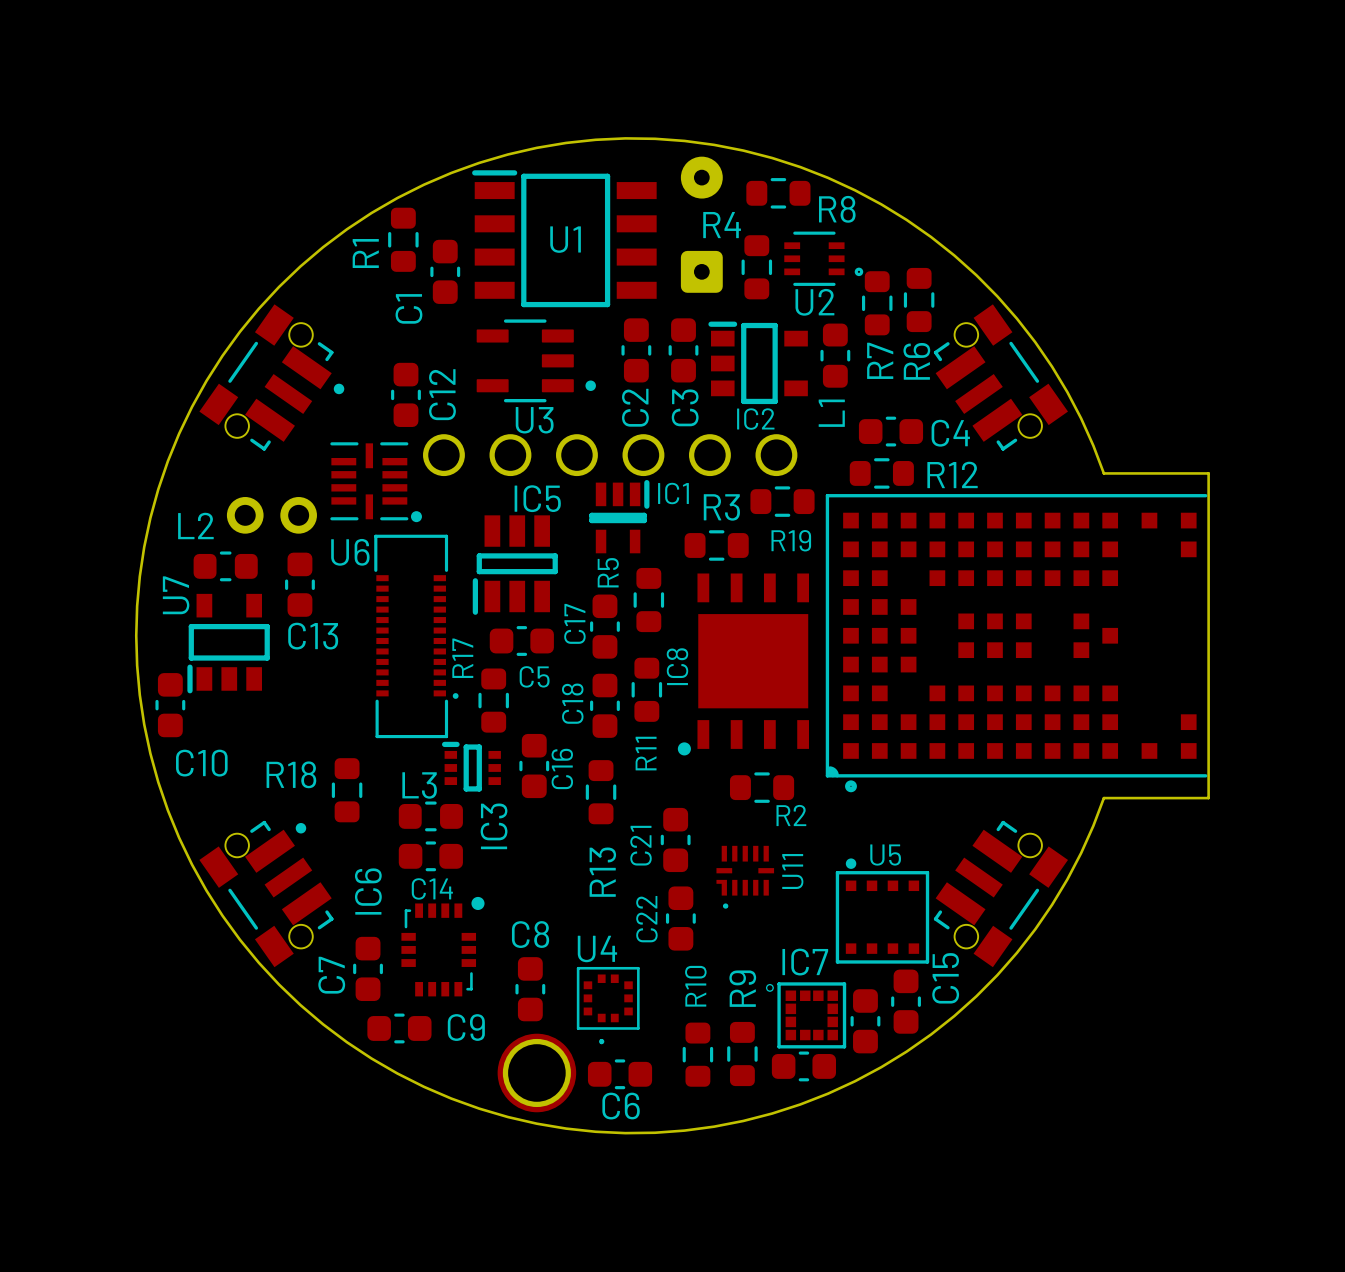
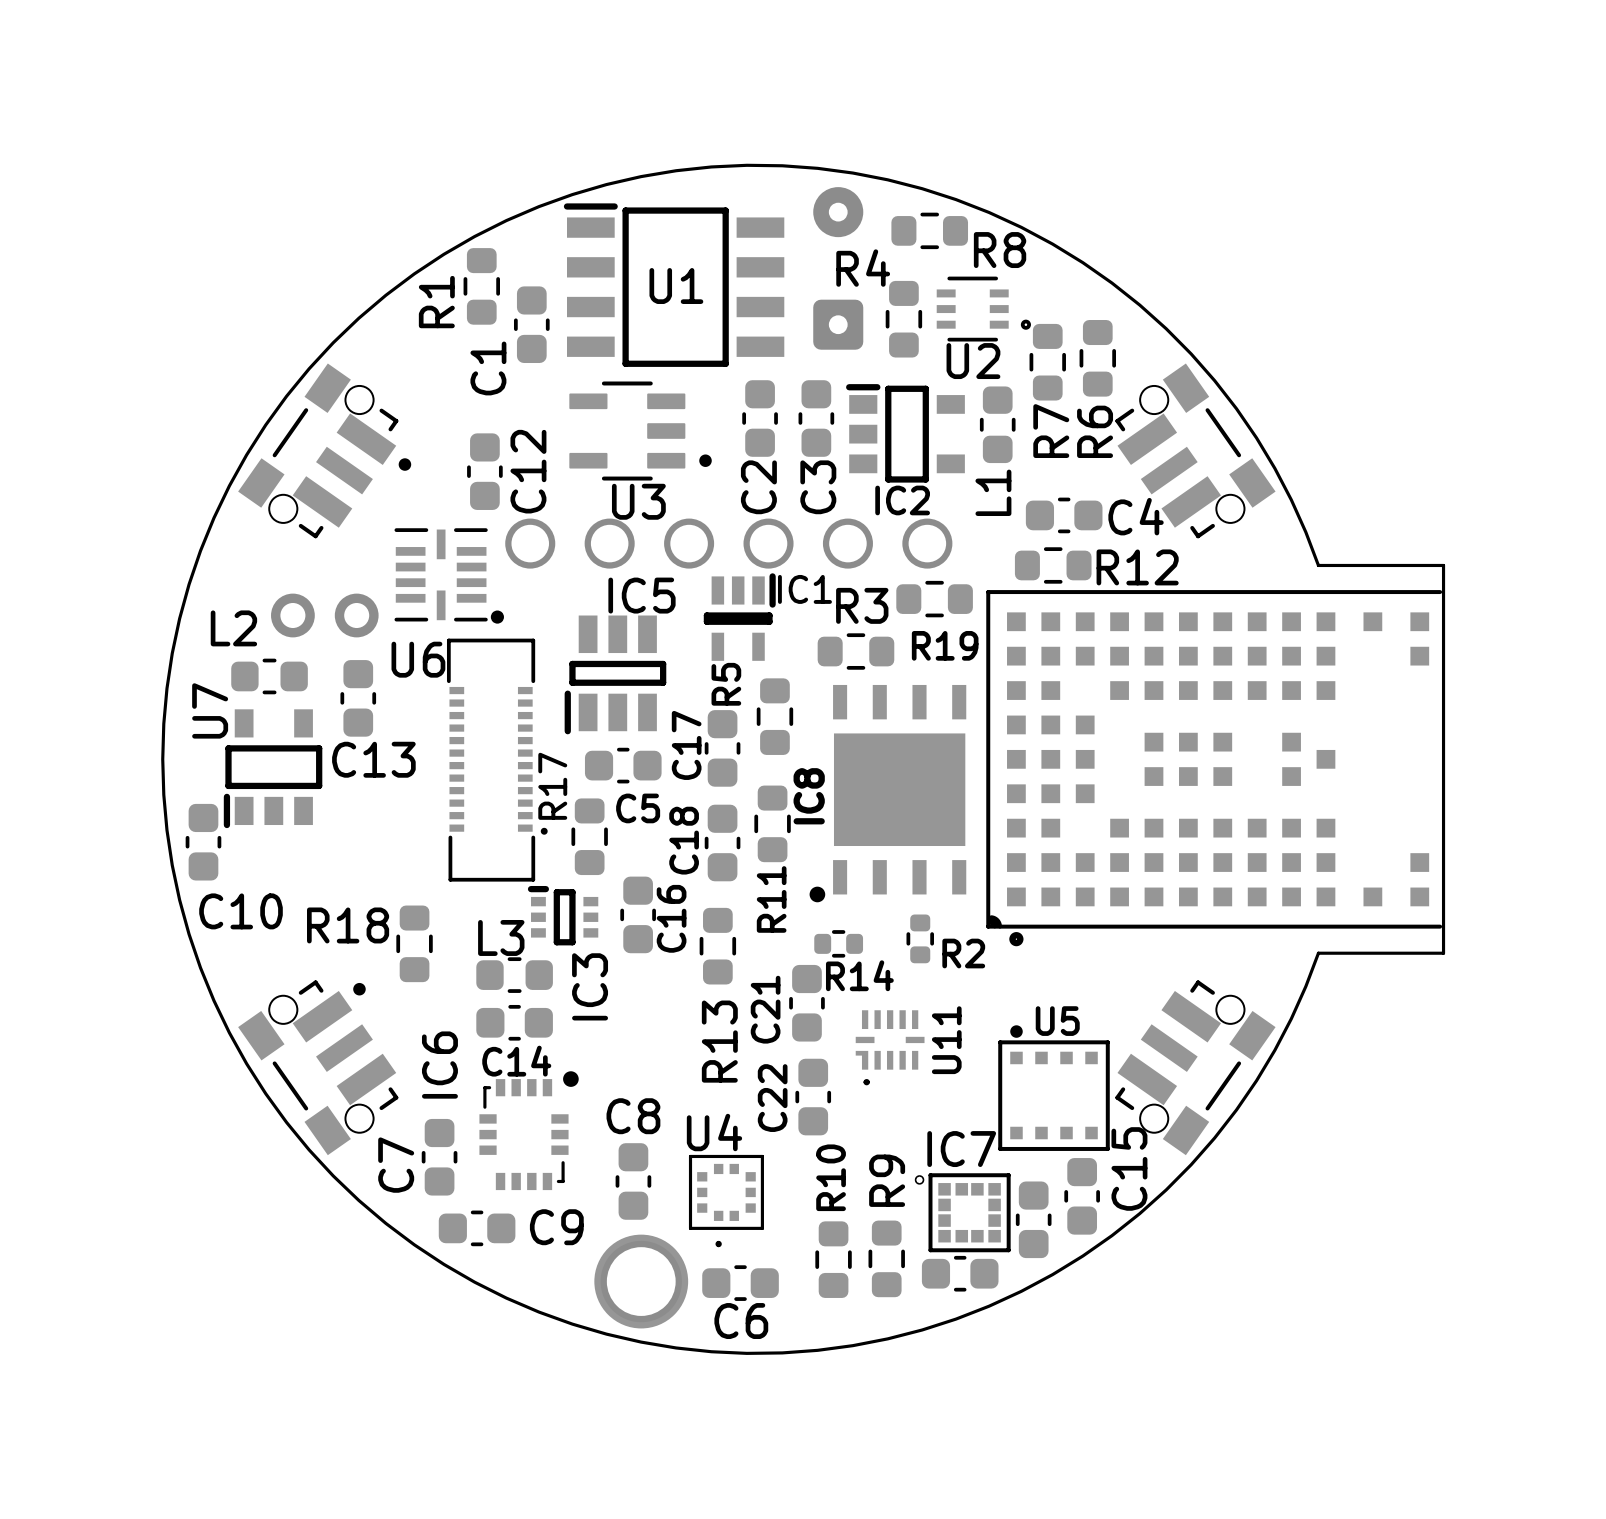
R2 footprint: [729, 772, 795, 803] -> [906, 914, 935, 964]
R14: none -> (838, 943)

